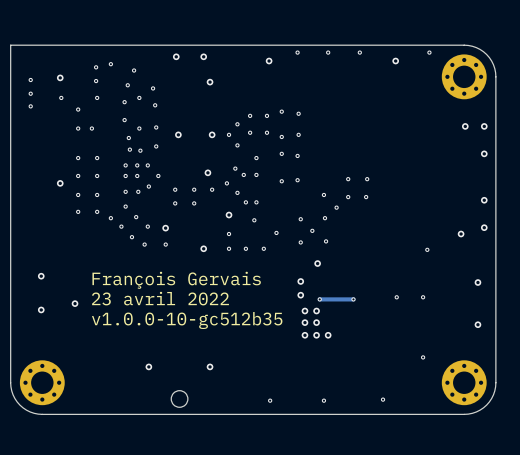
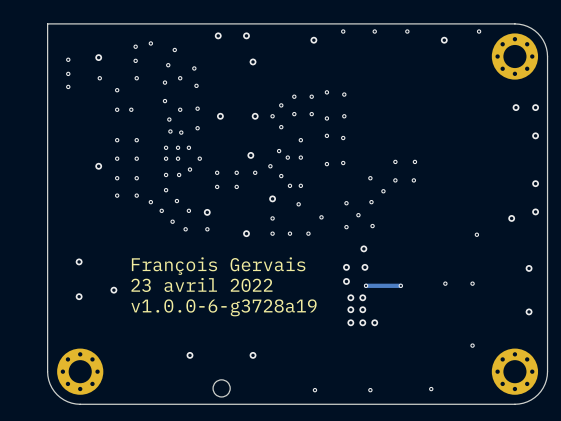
via: none -> (364, 267)
text: v1.0.0-10-gc512b35 (187, 320) -> v1.0.0-6-g3728a19 (224, 307)

